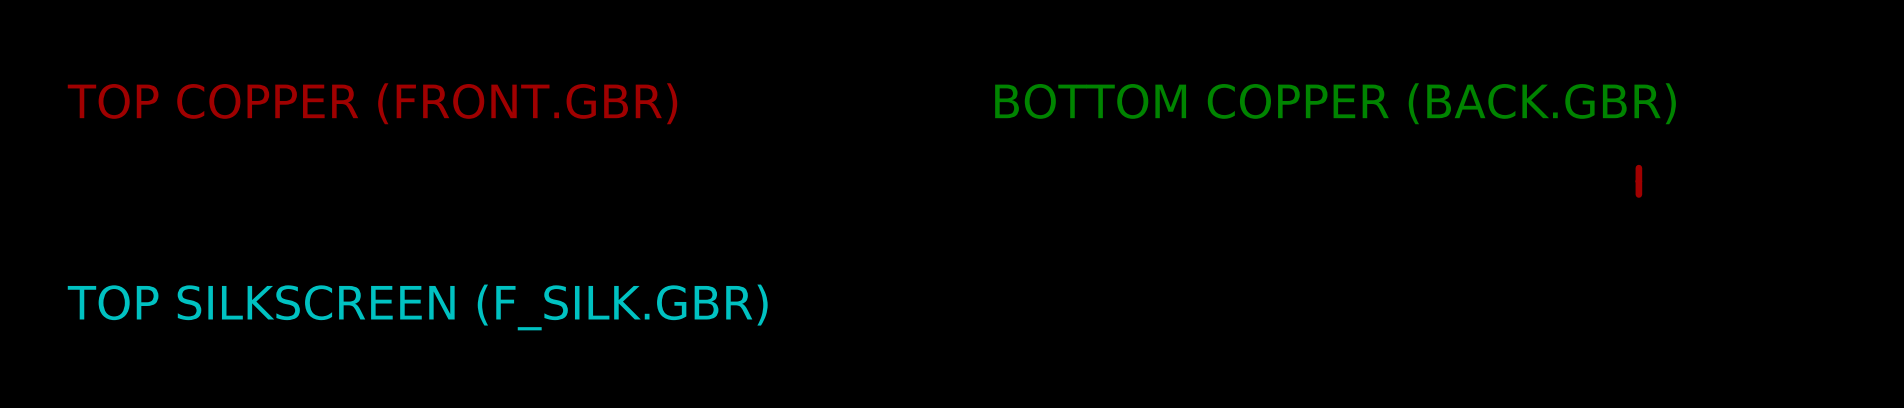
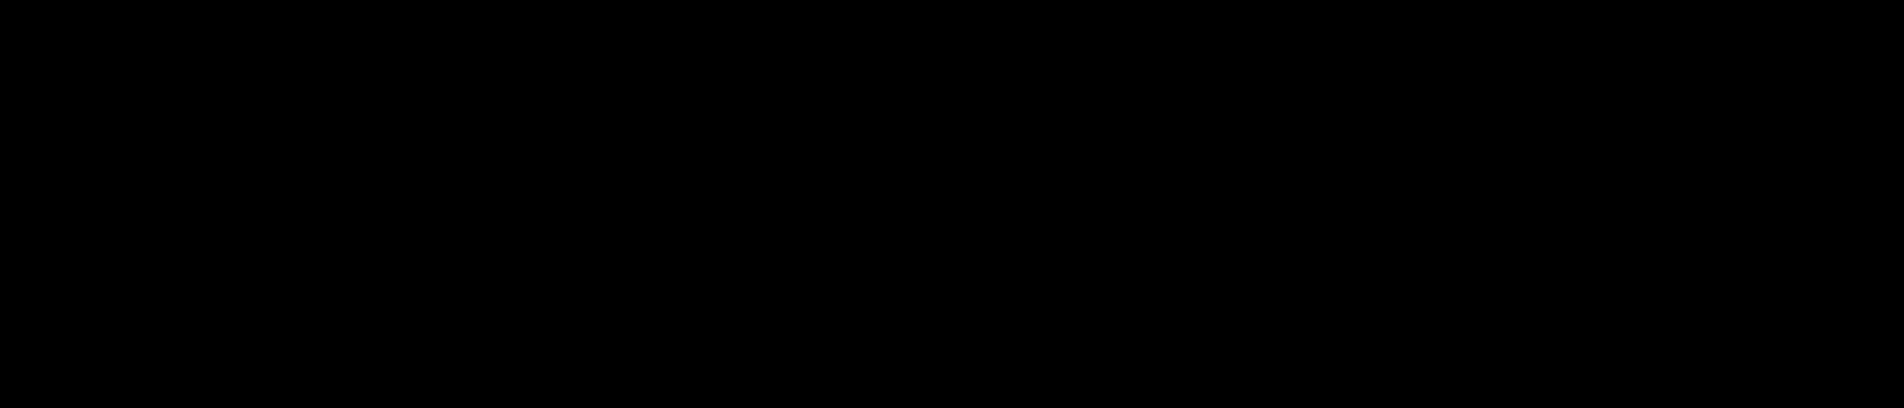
text: TOP COPPER (FRONT.GBR) (372, 103) -> none
text: BOTTOM COPPER (BACK.GBR) (1335, 103) -> none
top track: (1638, 168) (1638, 194) -> none
text: TOP SILKSCREEN (F_SILK.GBR) (417, 307) -> none

